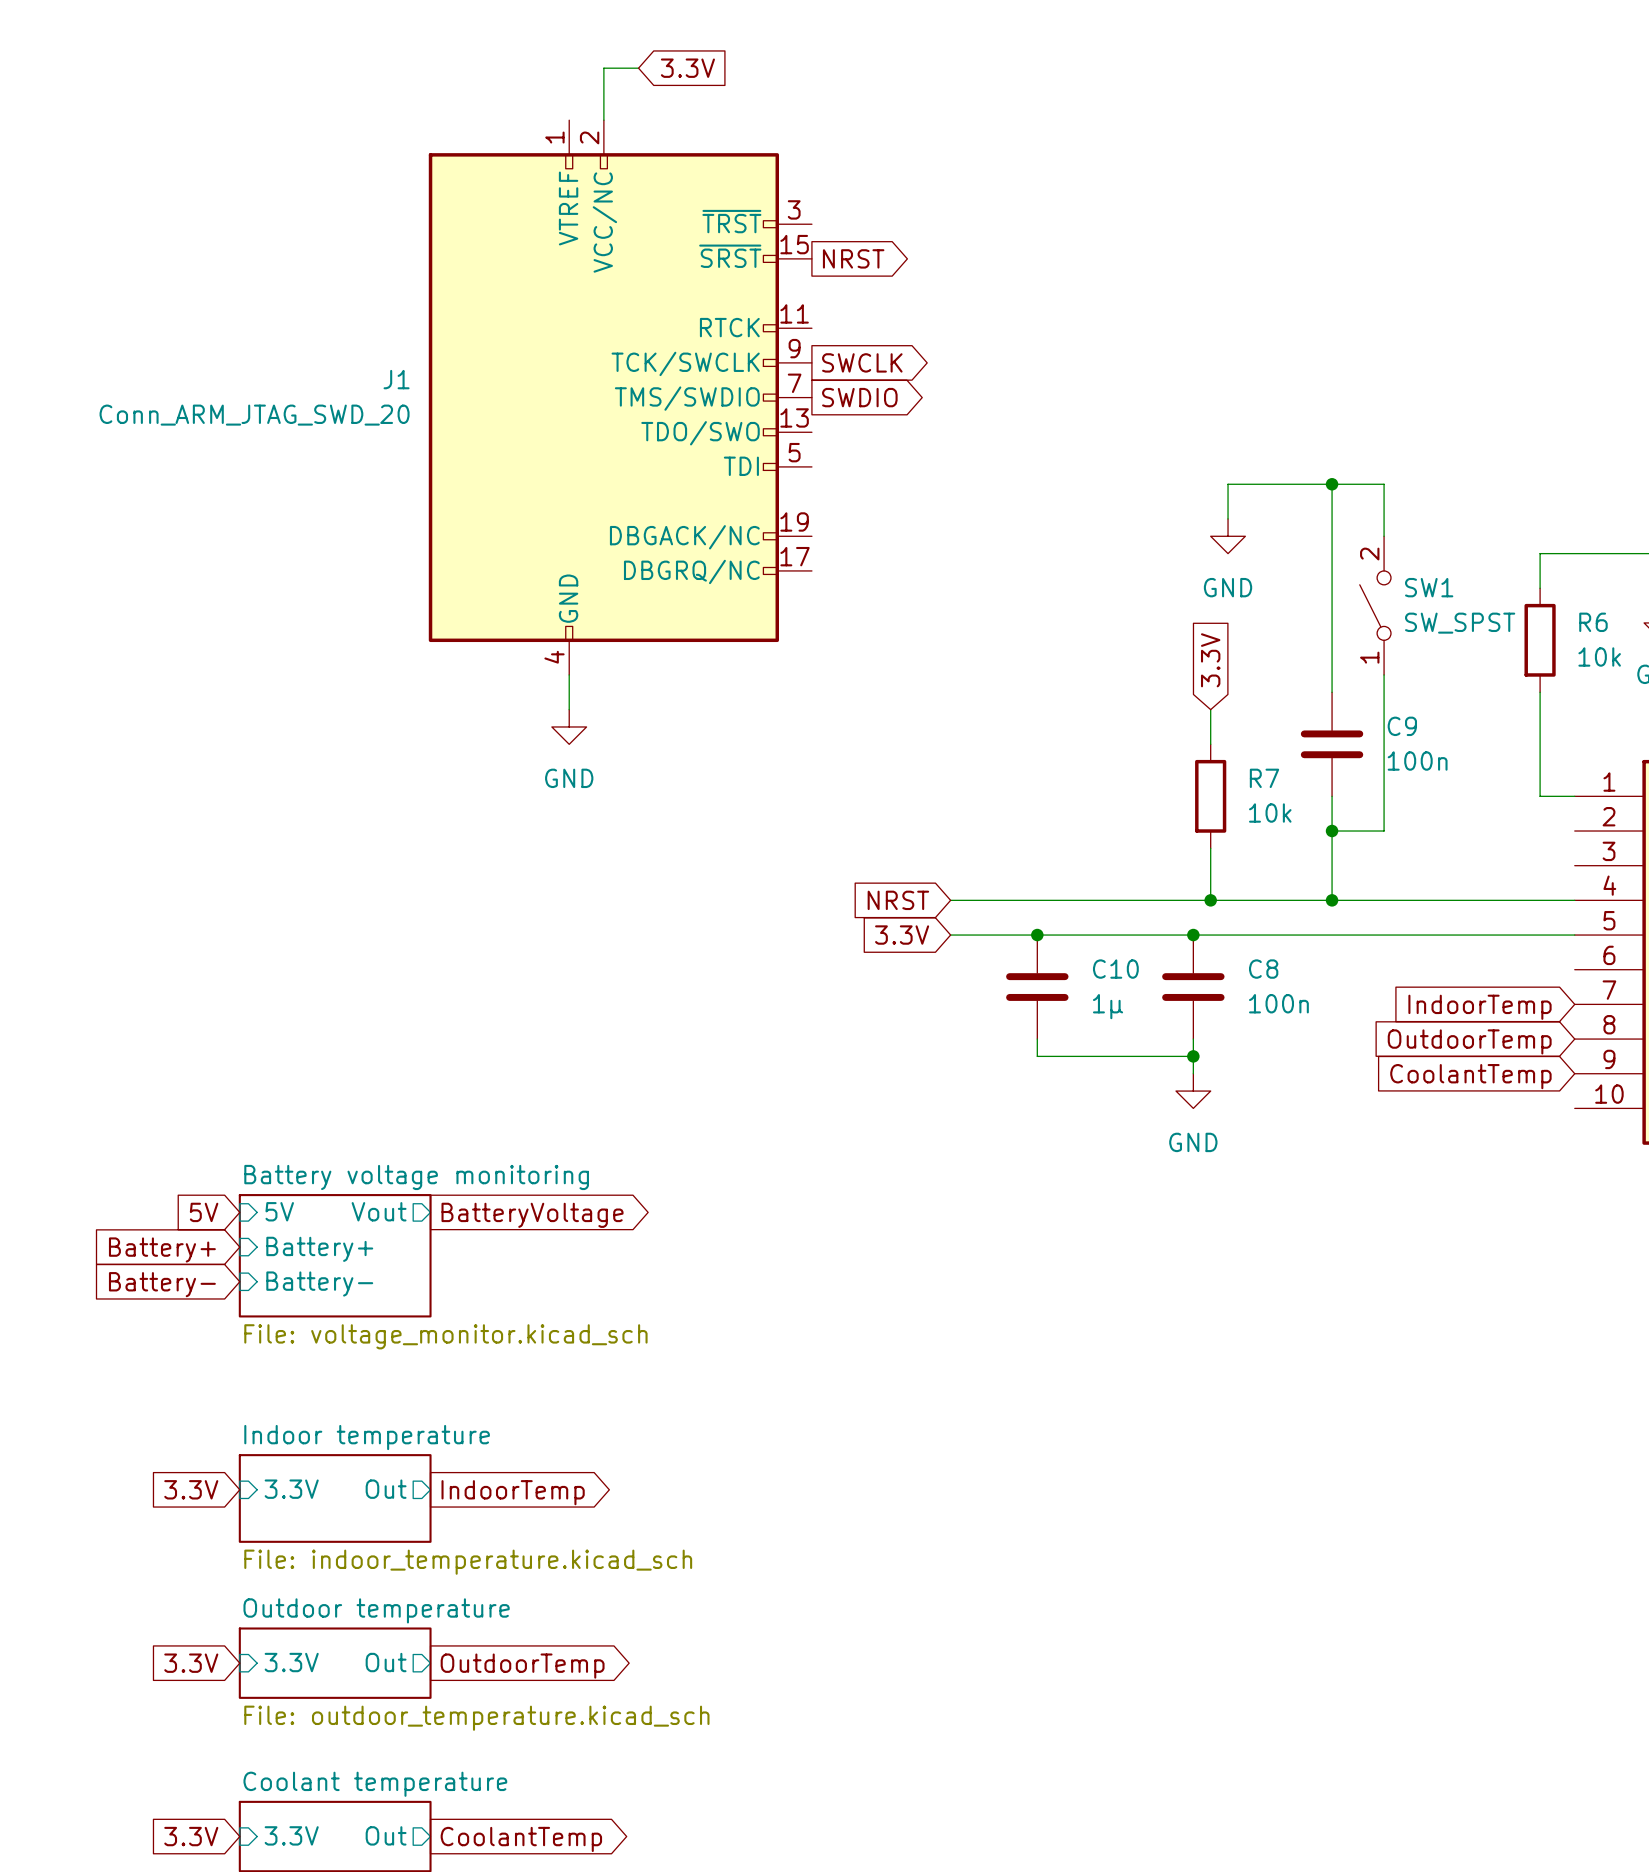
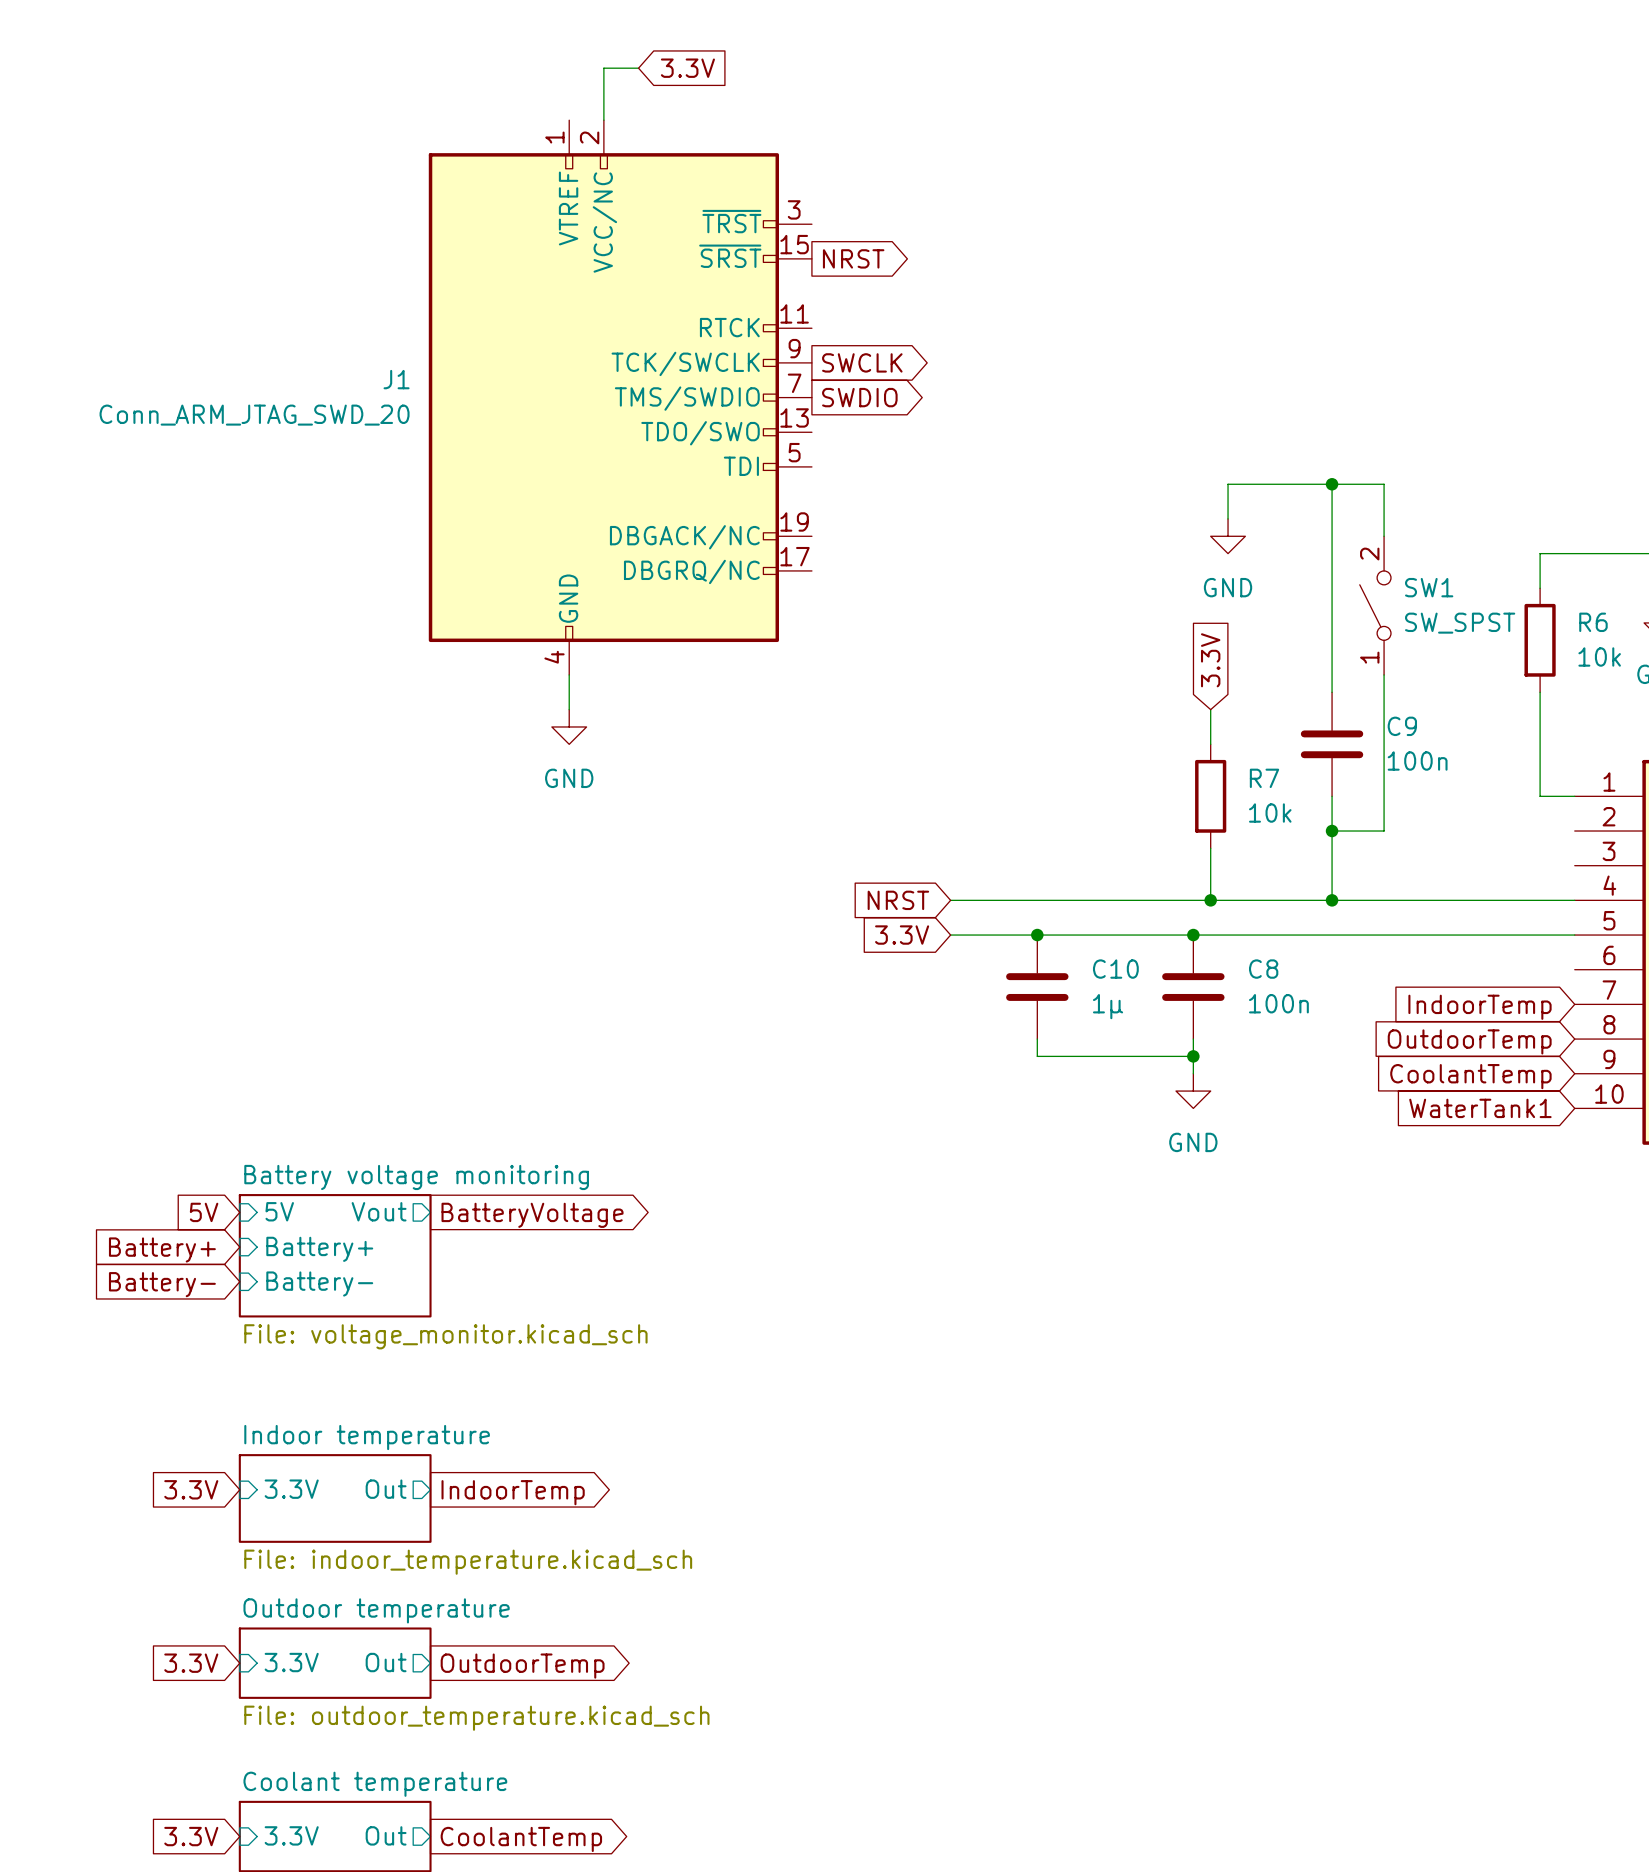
global label: none -> WaterTank1 (1480, 1108)

